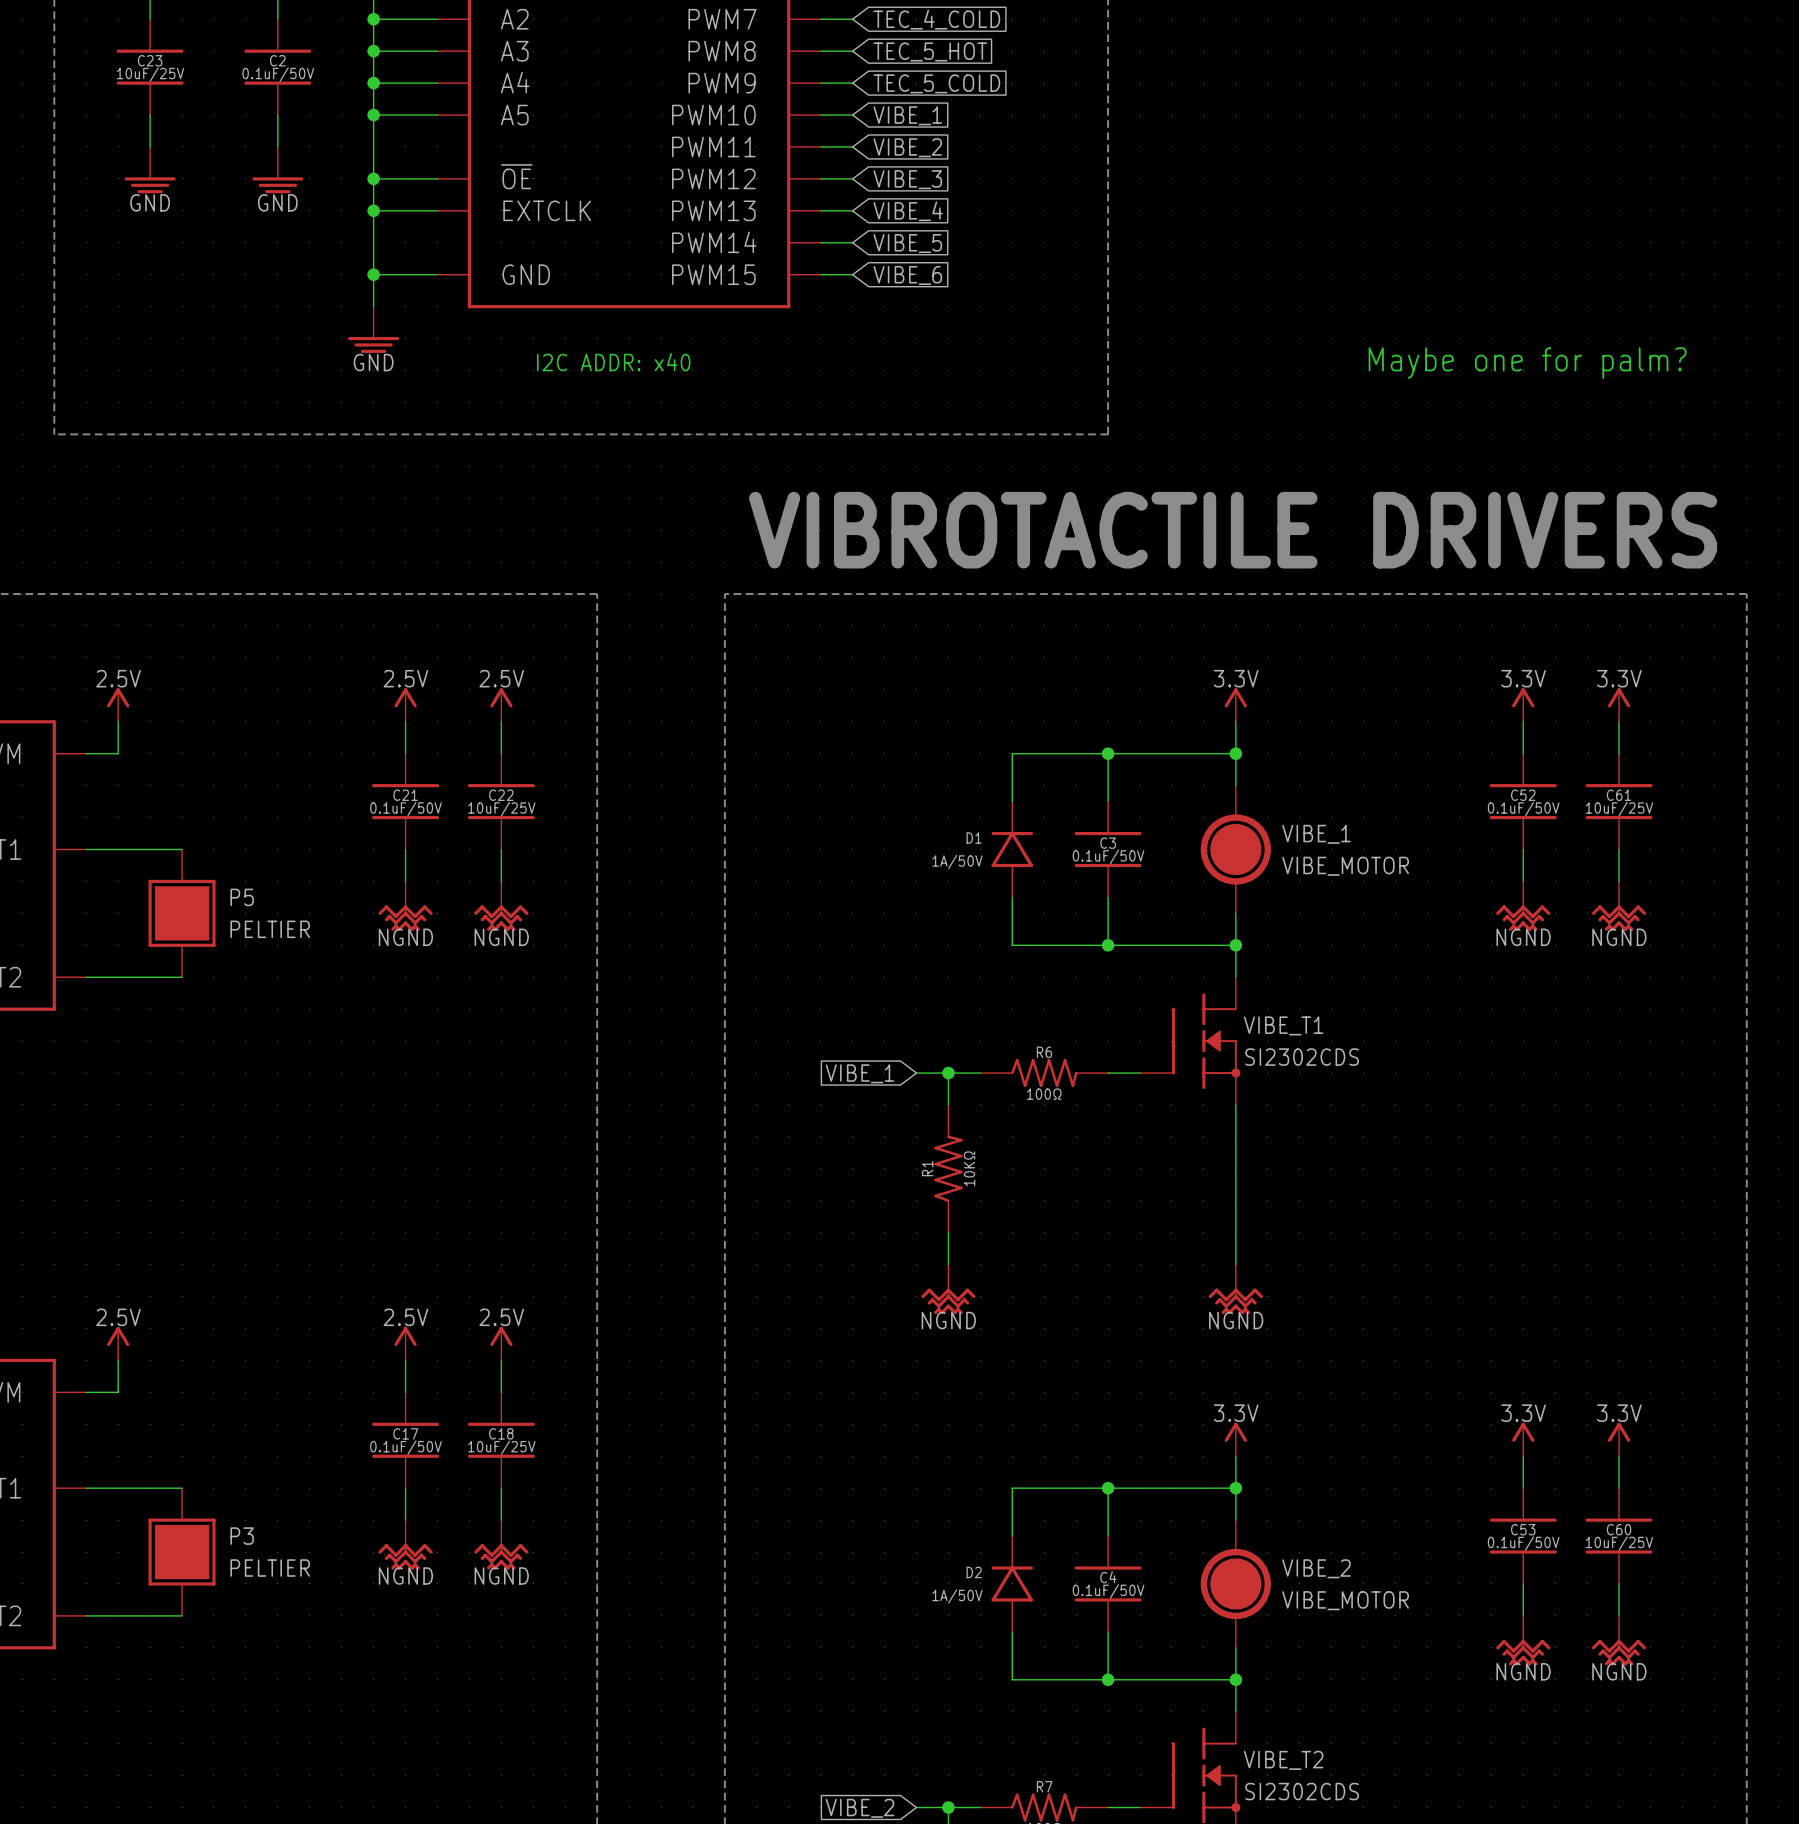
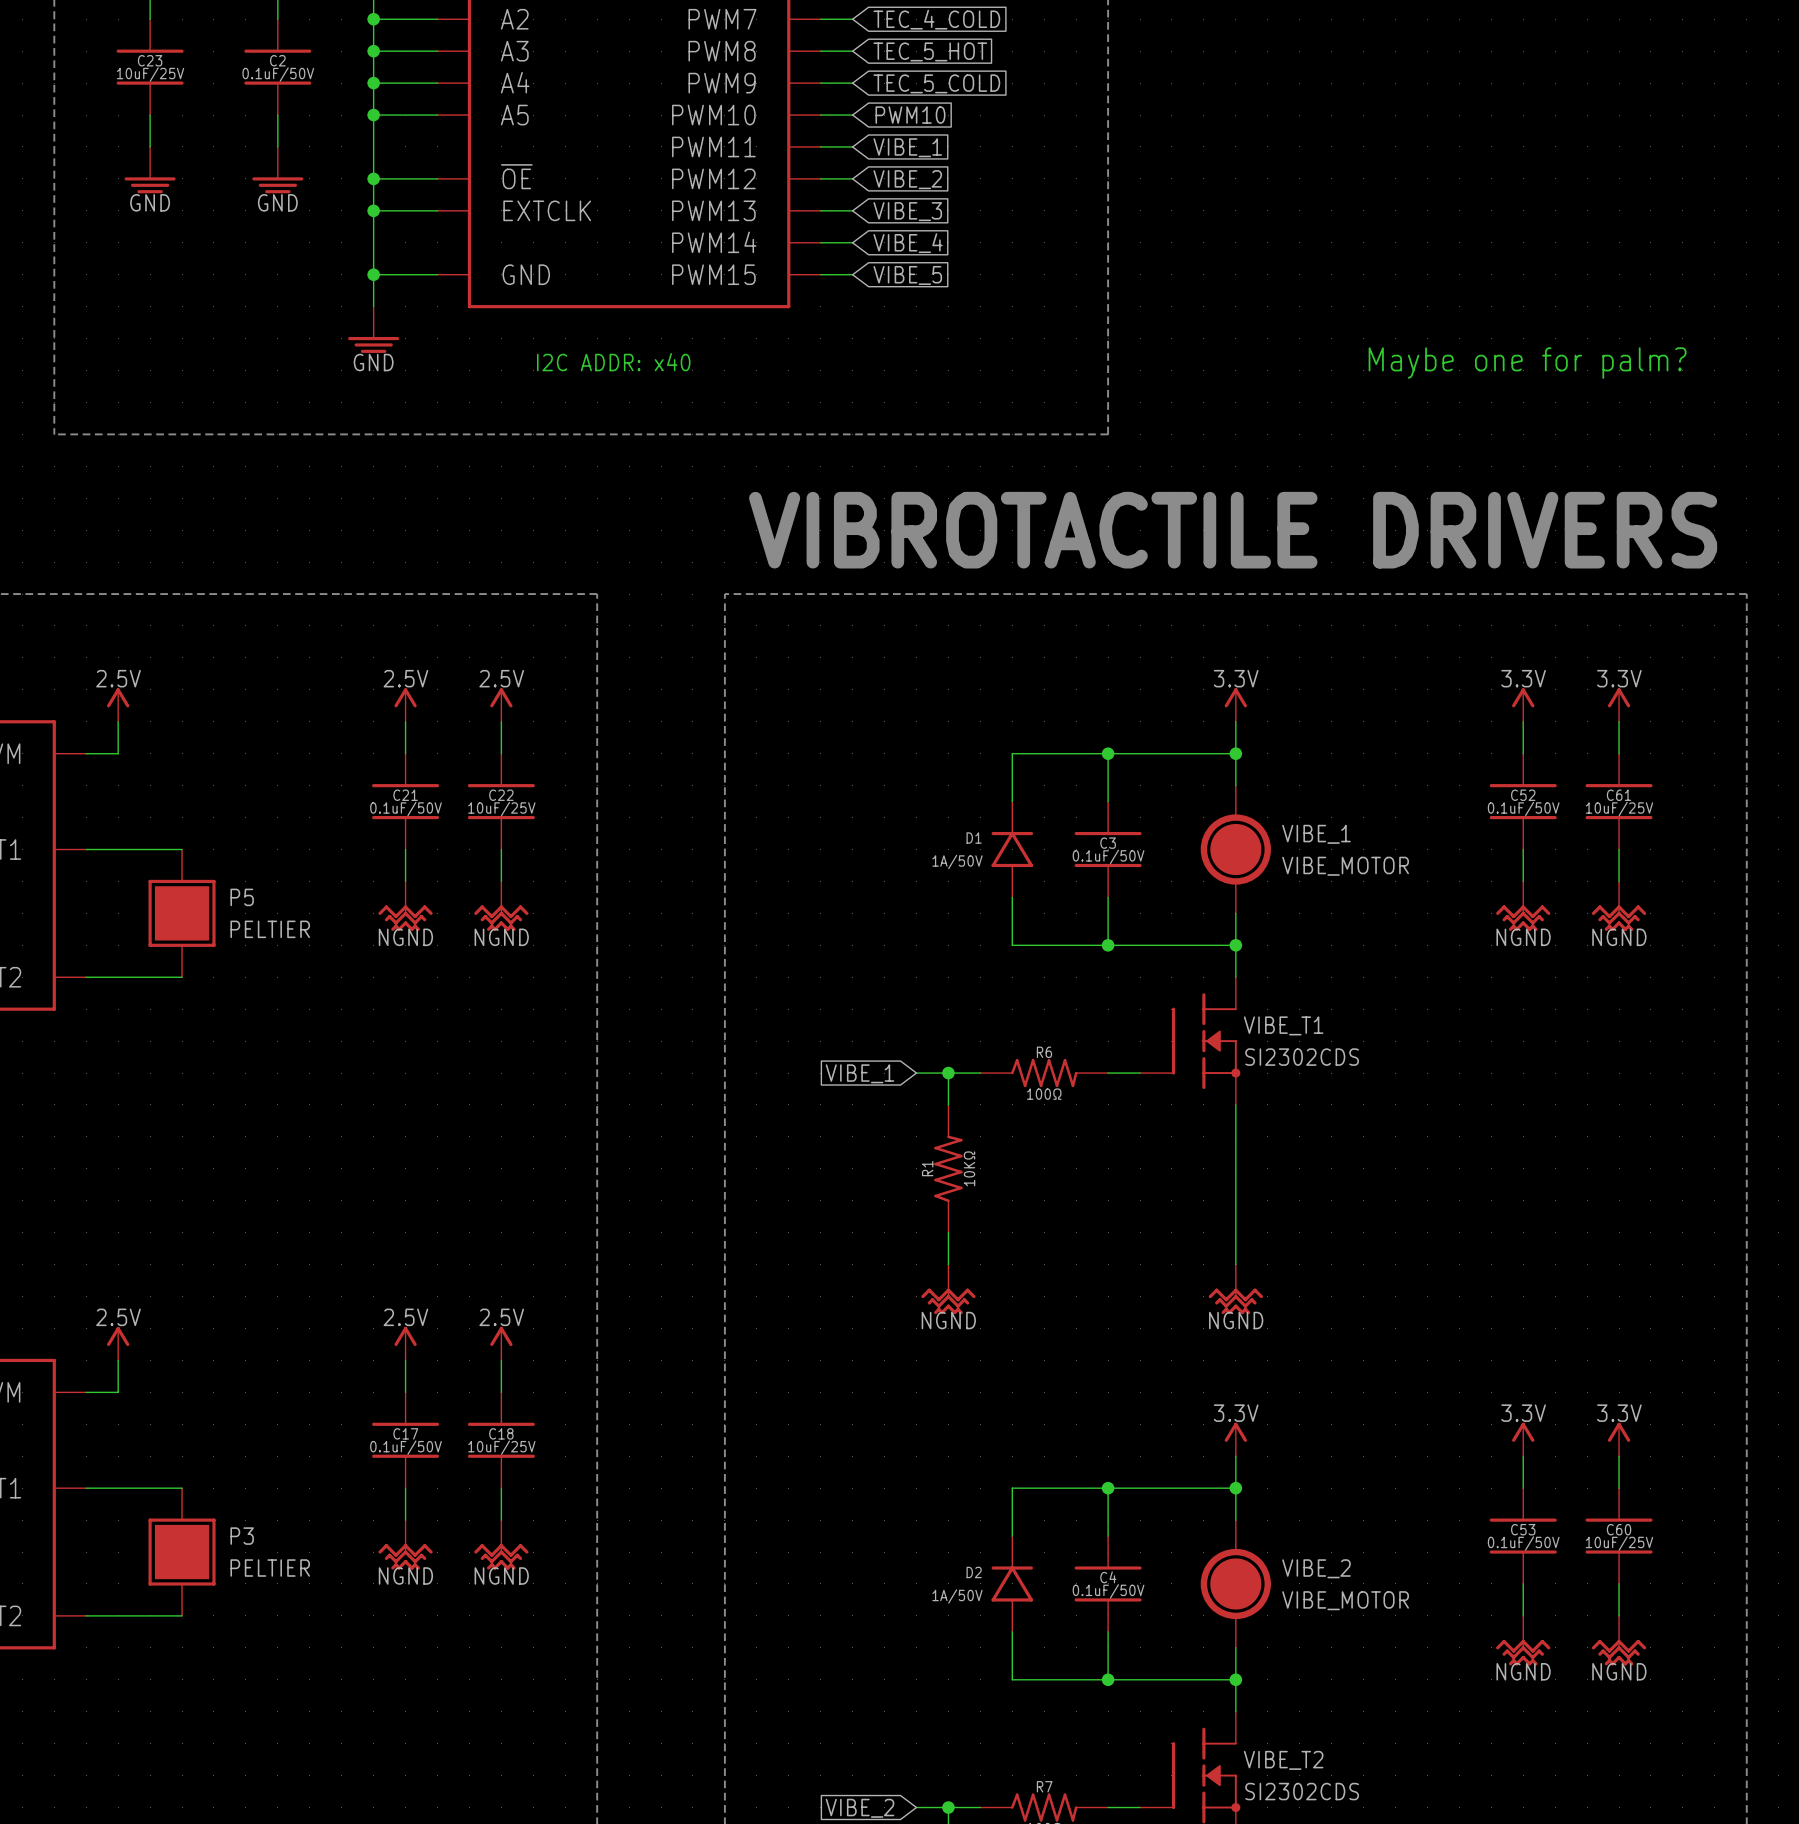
global label: VIBE_1 (907, 115) -> PWM10 (910, 115)
global label: VIBE_2 (907, 147) -> VIBE_1 (907, 147)
global label: VIBE_3 (907, 179) -> VIBE_2 (907, 179)
global label: VIBE_4 (908, 211) -> VIBE_3 (907, 211)
global label: VIBE_5 (907, 243) -> VIBE_4 (908, 243)
global label: VIBE_6 (907, 275) -> VIBE_5 (907, 275)

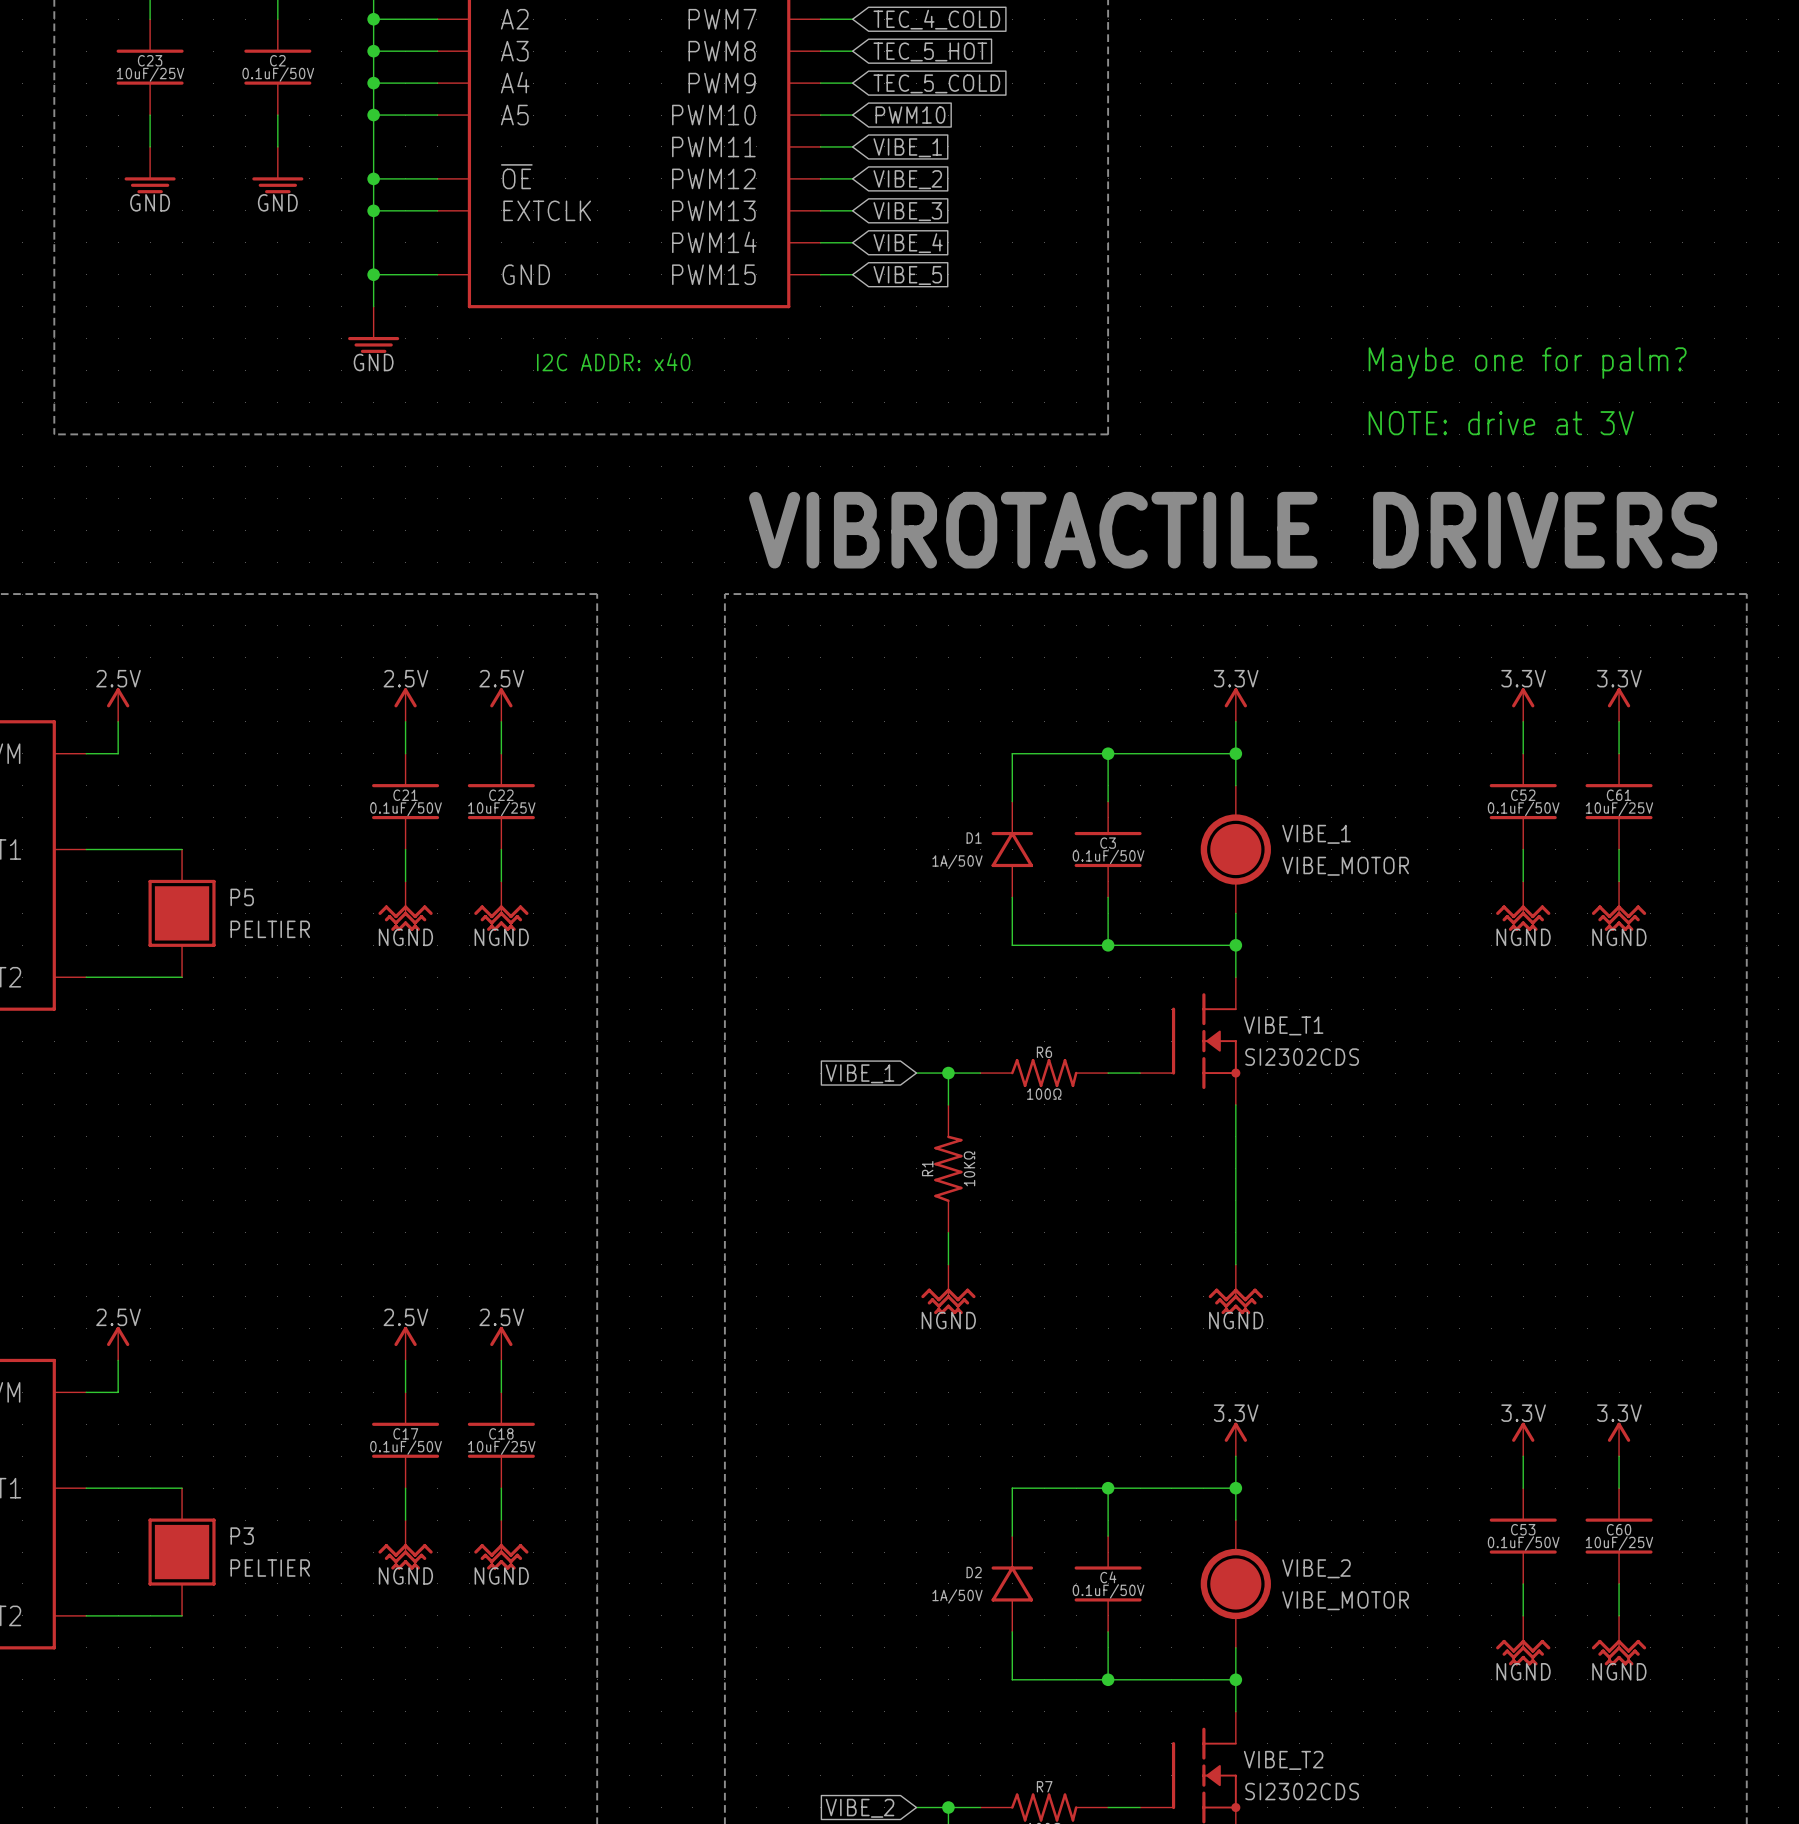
text: none -> NOTE: drive at 3V (1501, 423)

